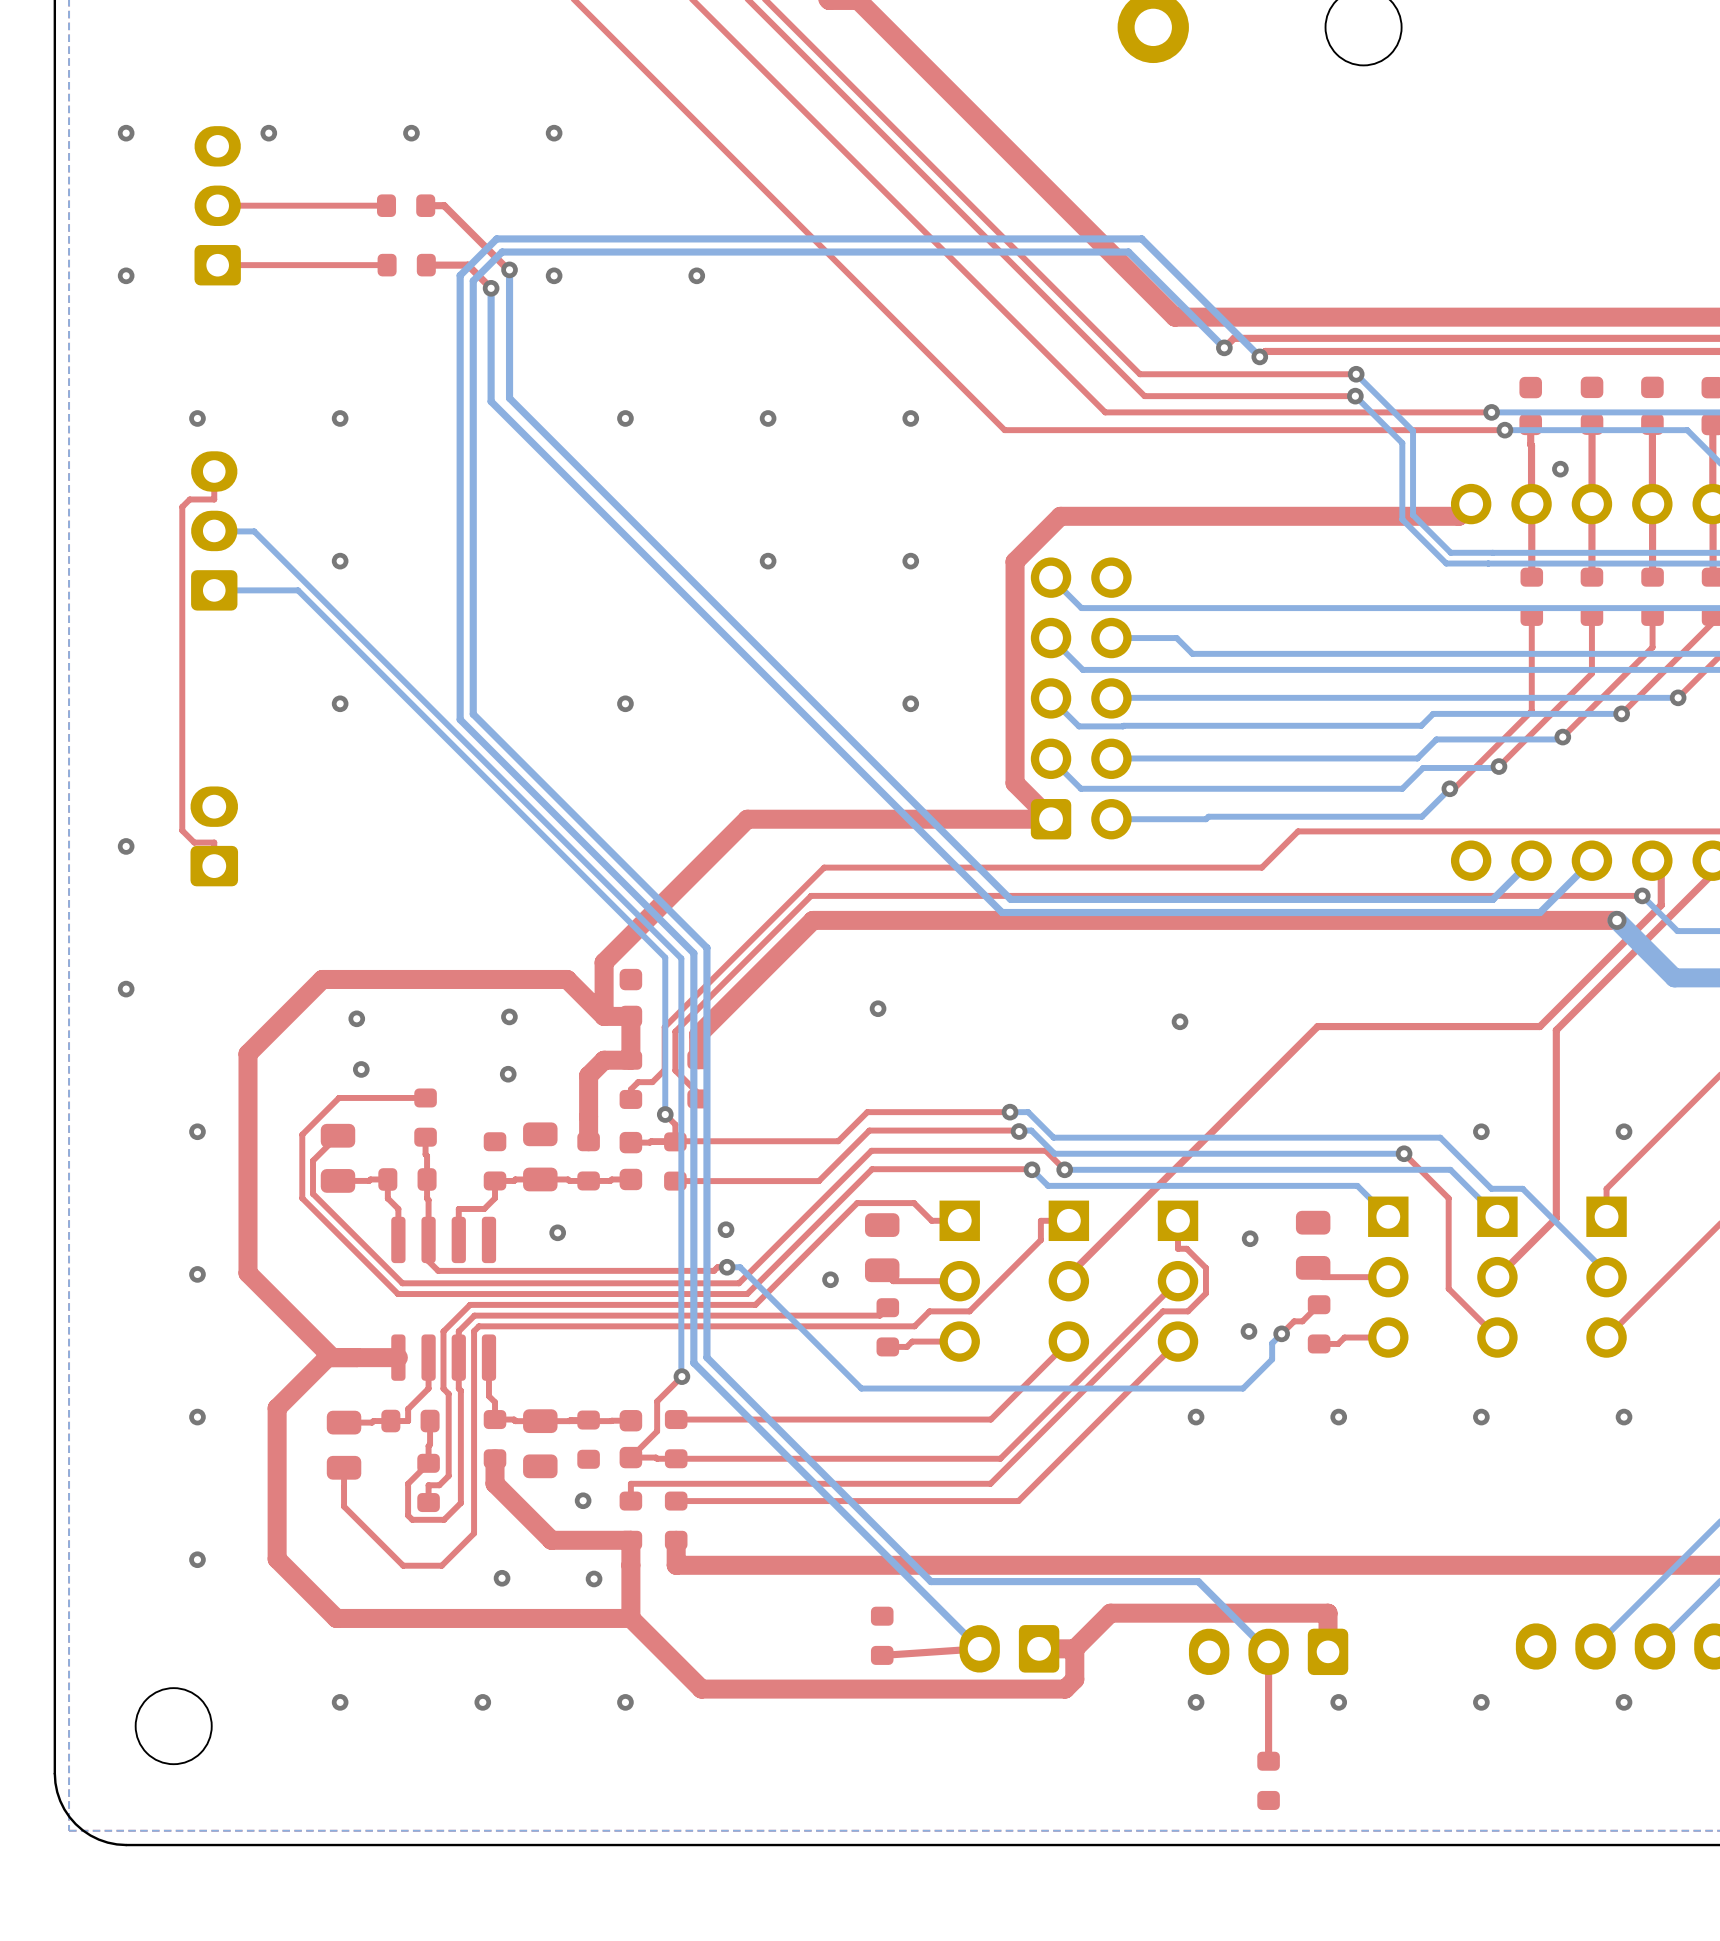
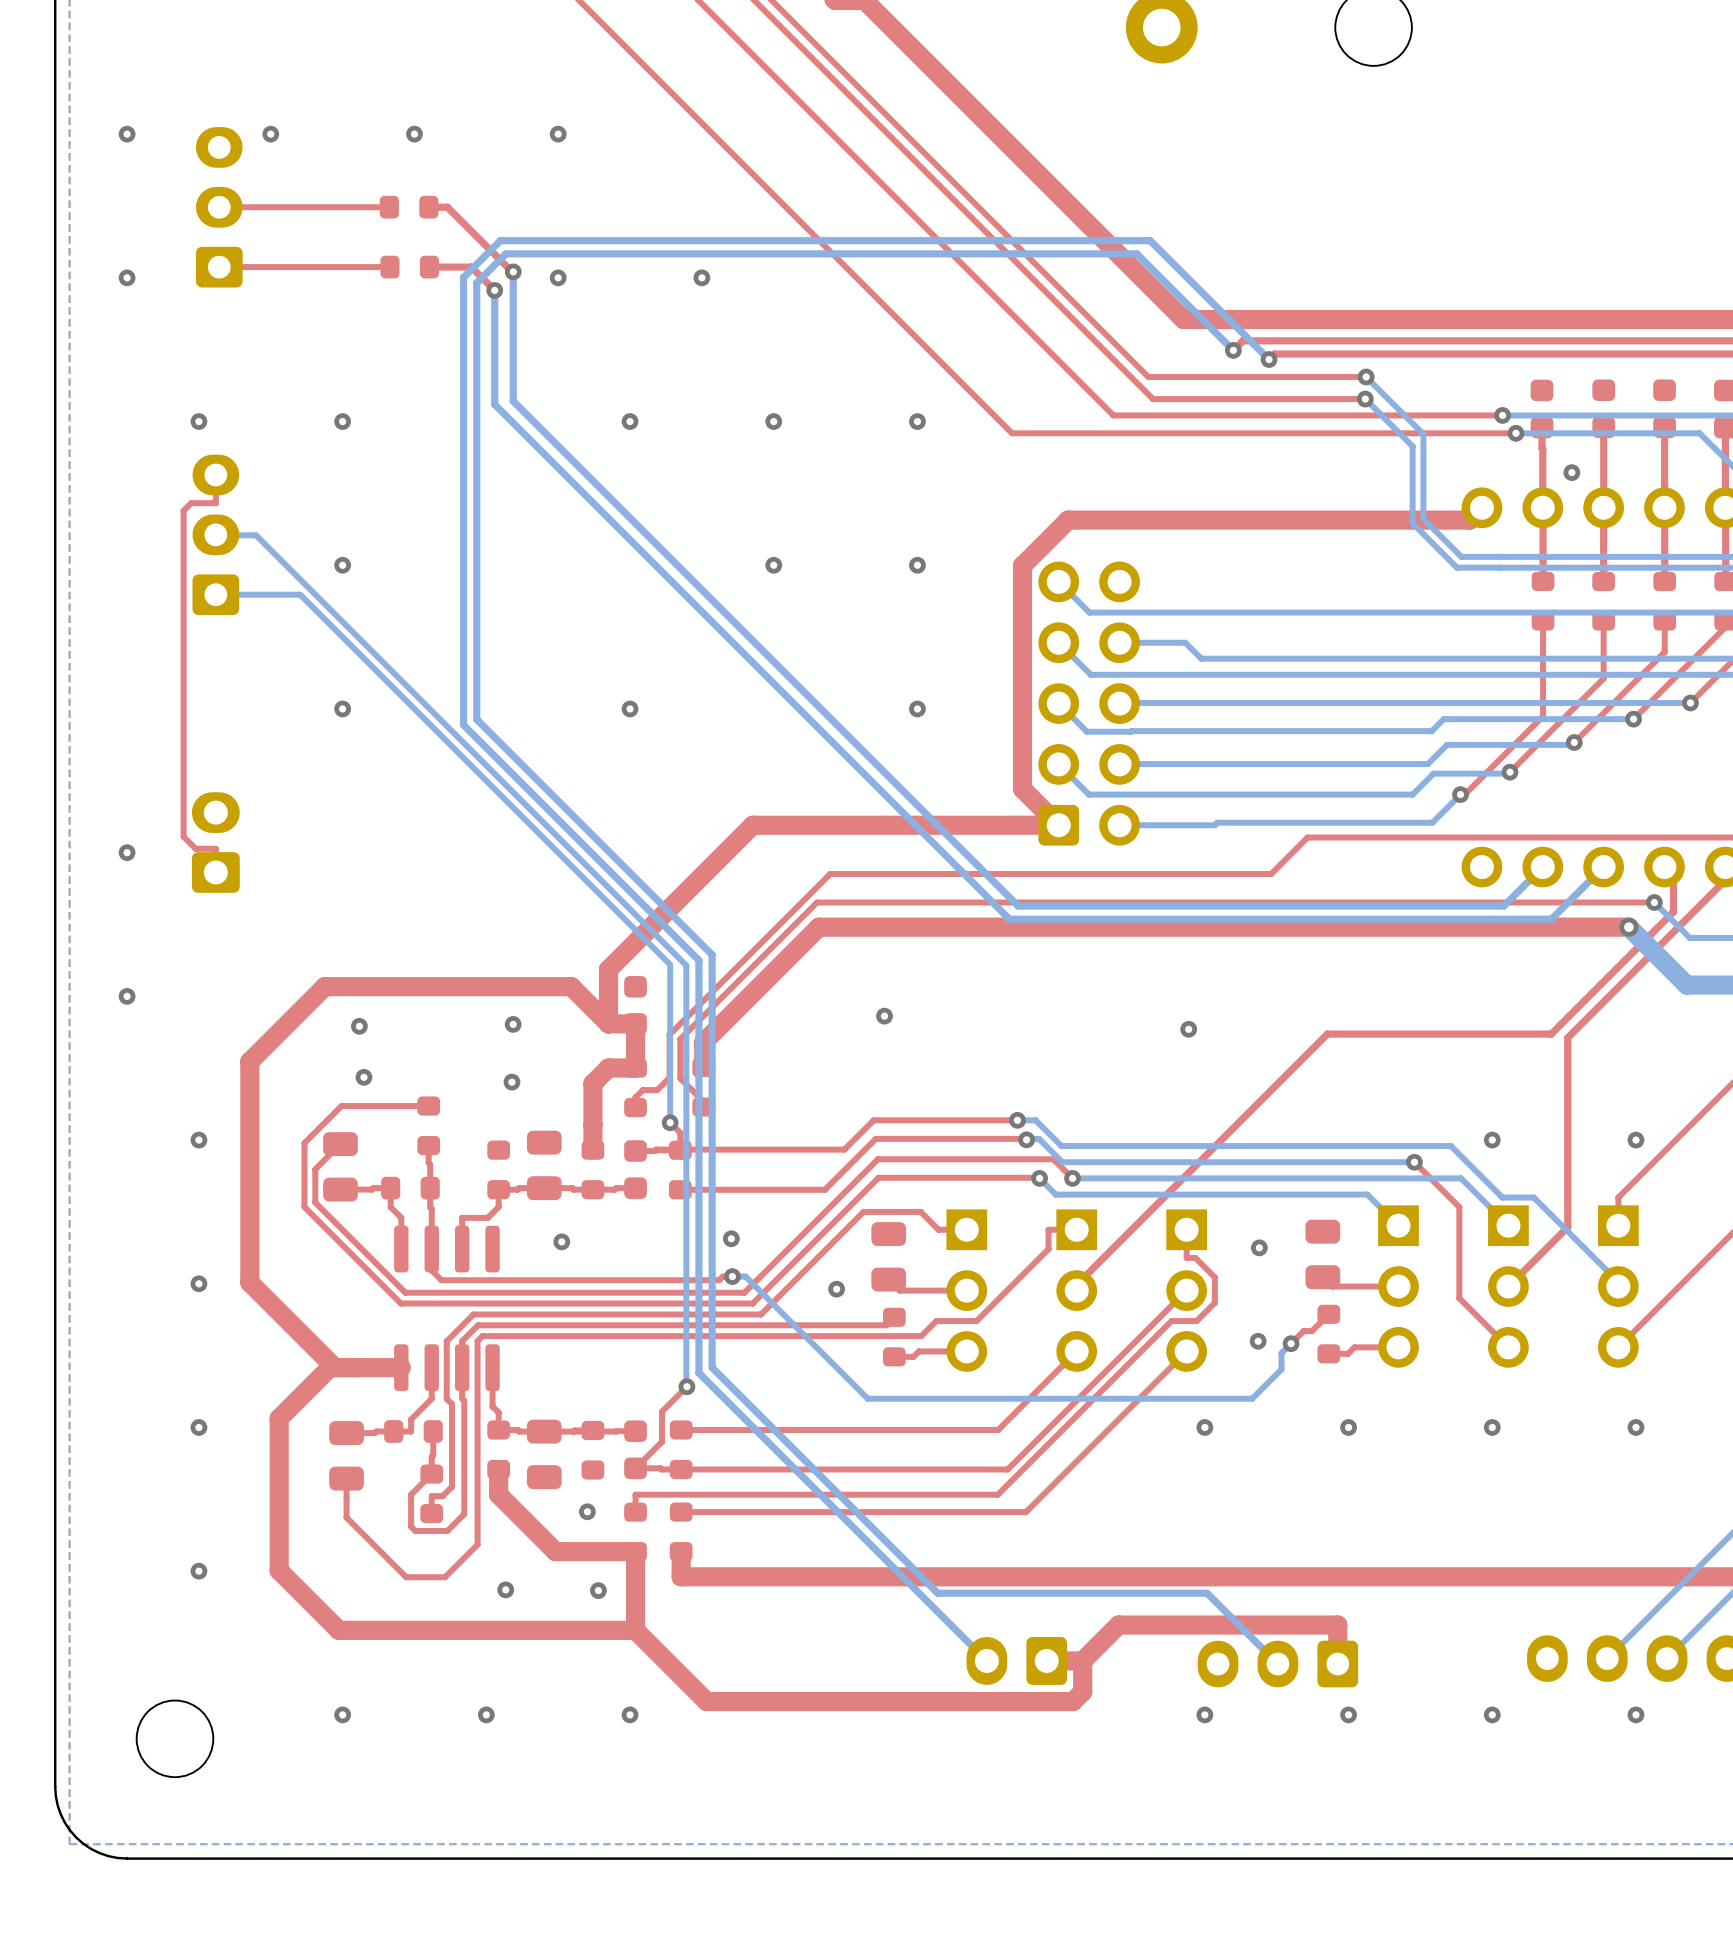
part: (882, 1635) -> none
top track: (979, 1648) (882, 1655) -> none
top track: (1268, 1651) (1268, 1761) -> none
part: (1268, 1780) -> none

